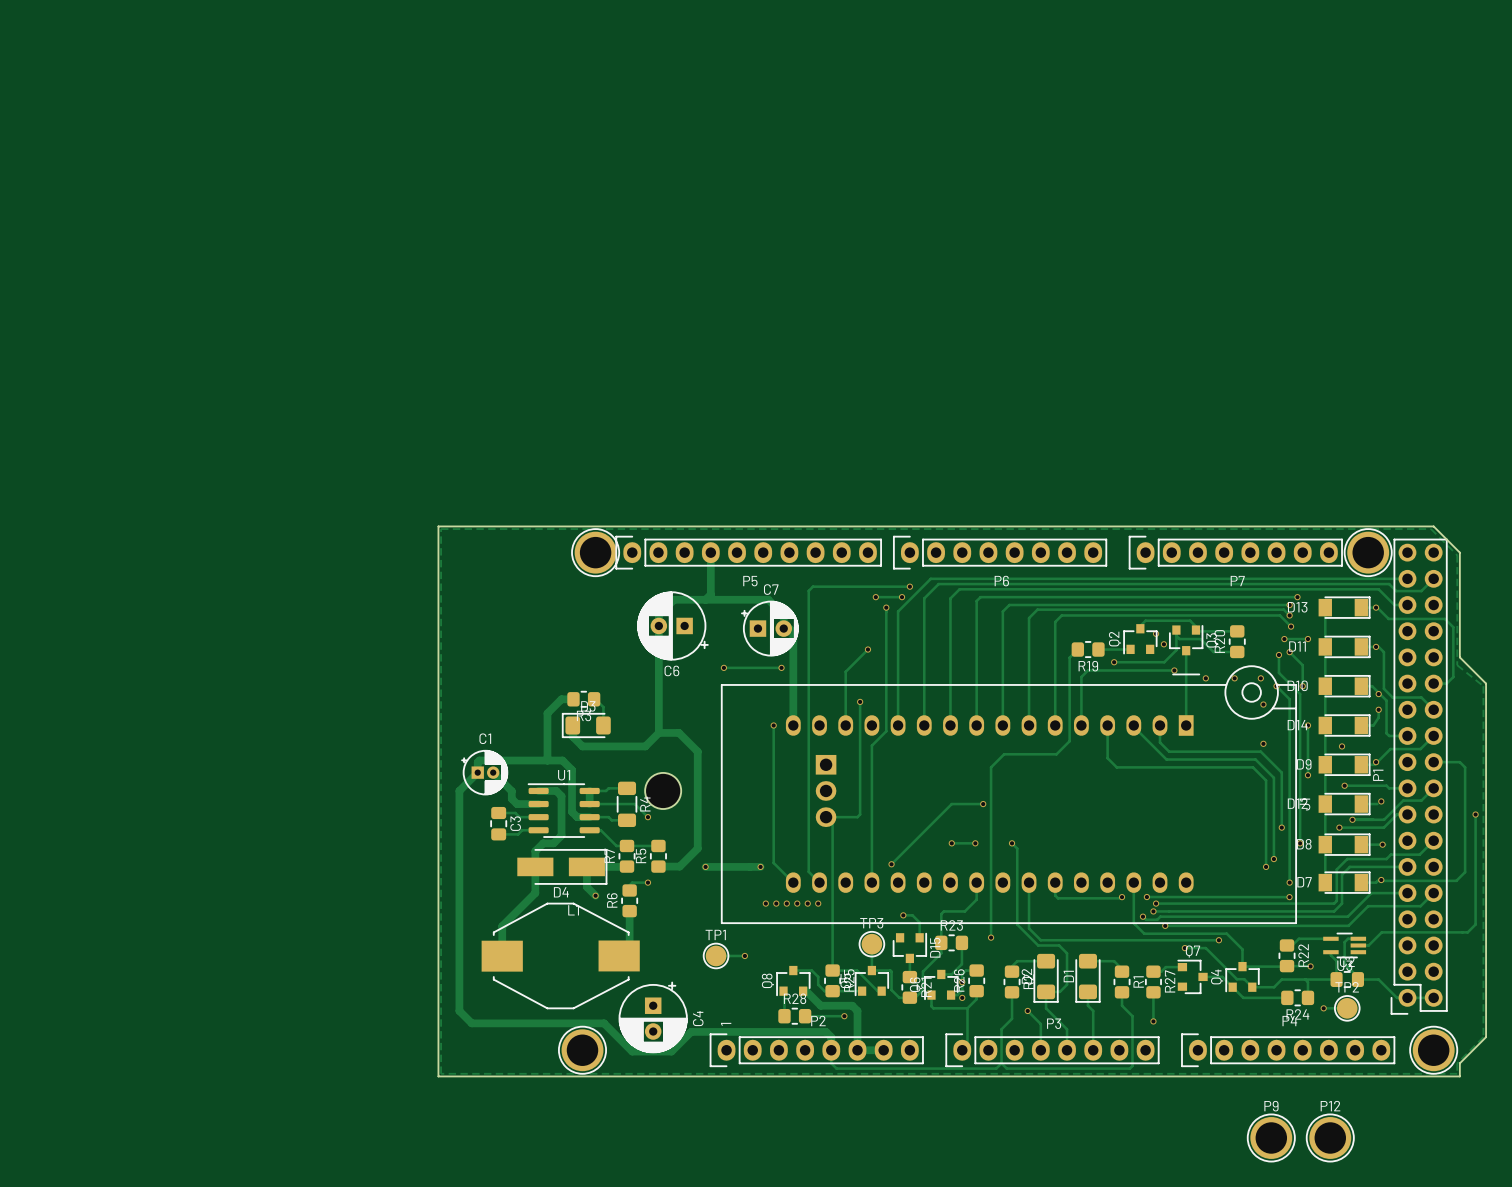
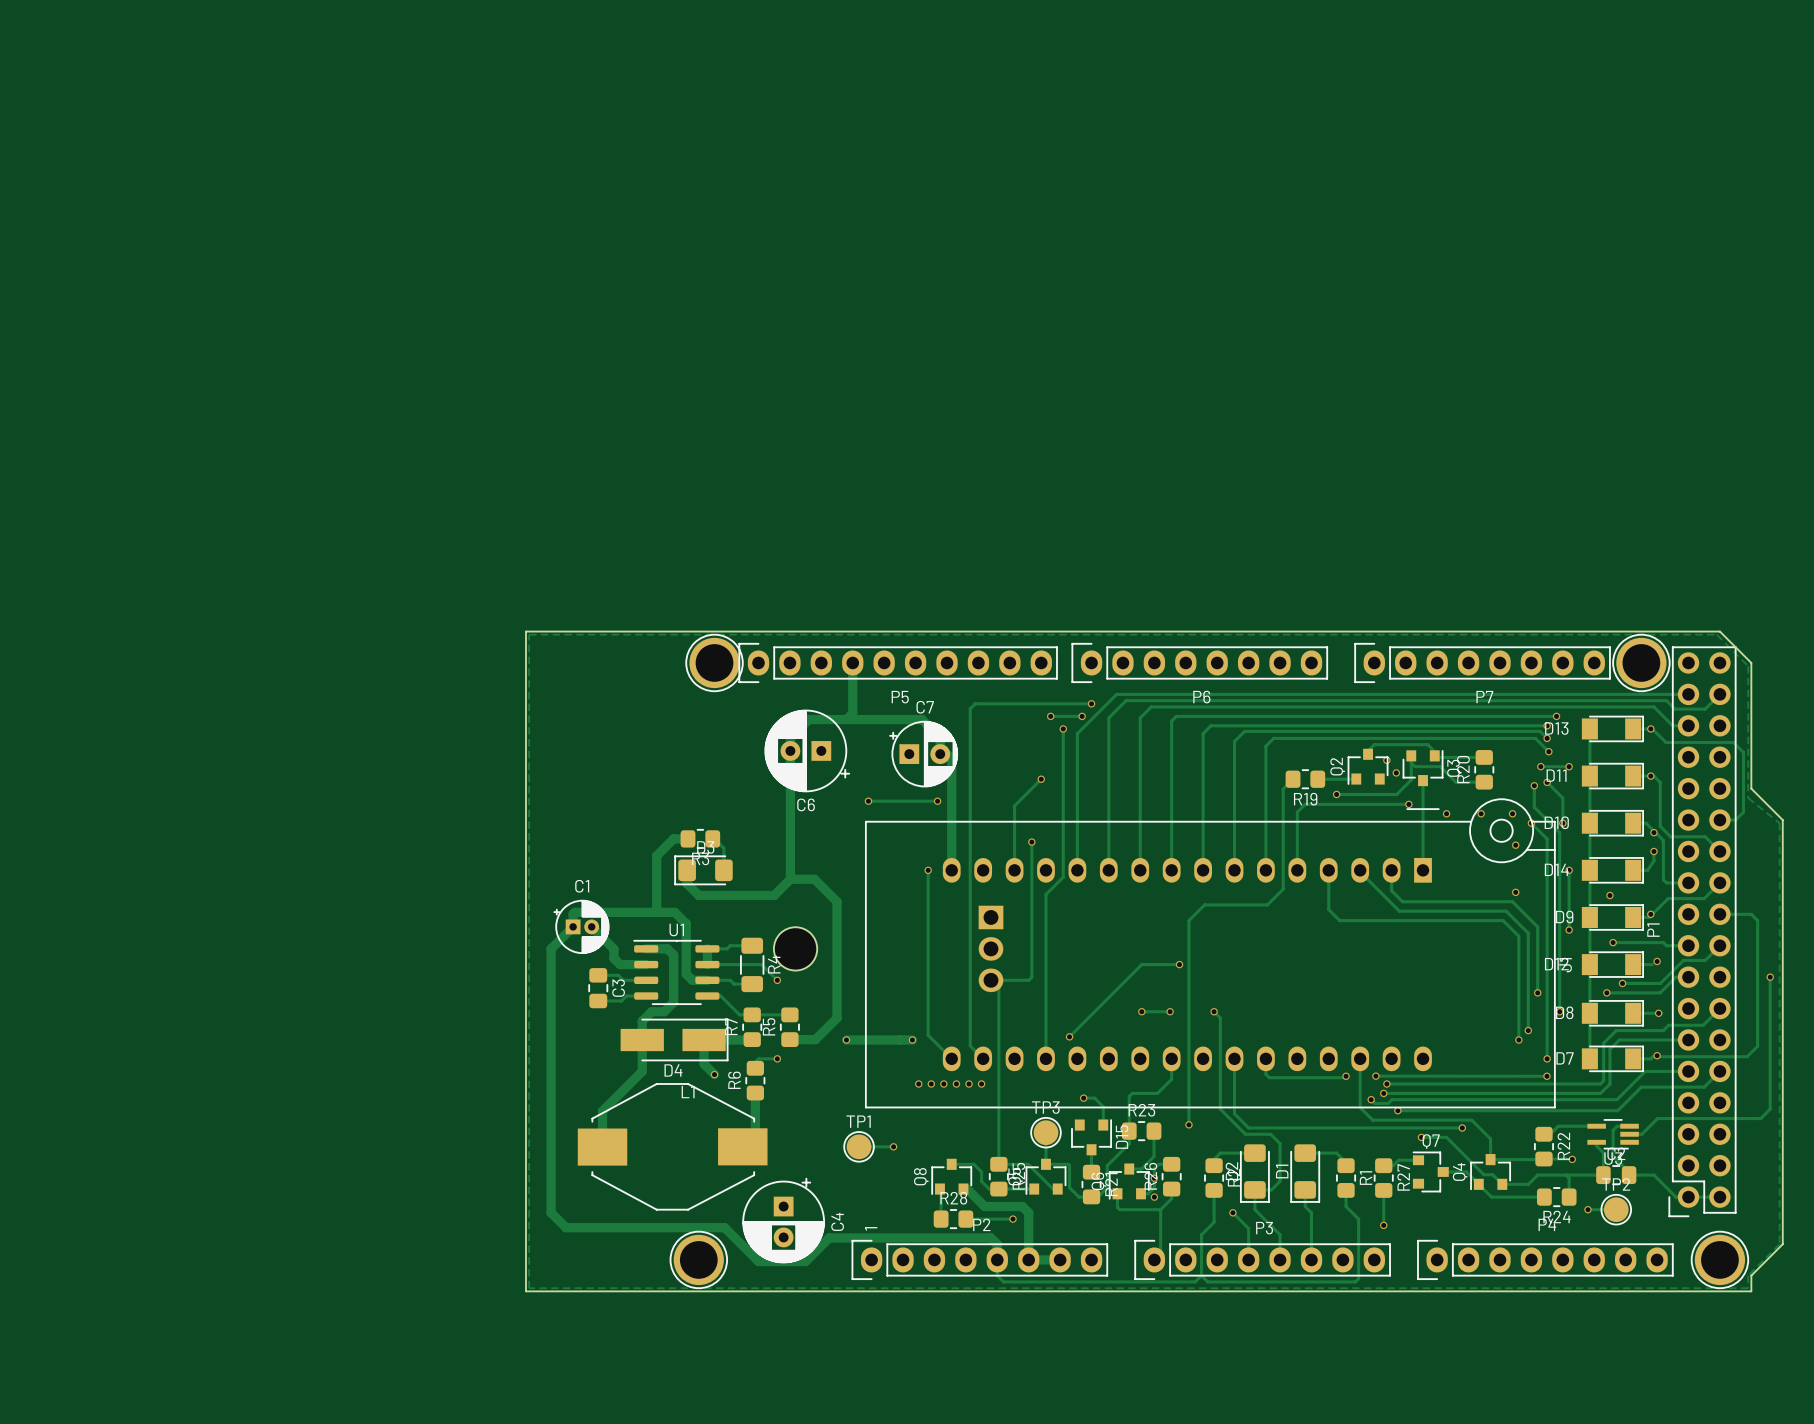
P9: (1271, 1137) -> none
P12: (1330, 1137) -> none

